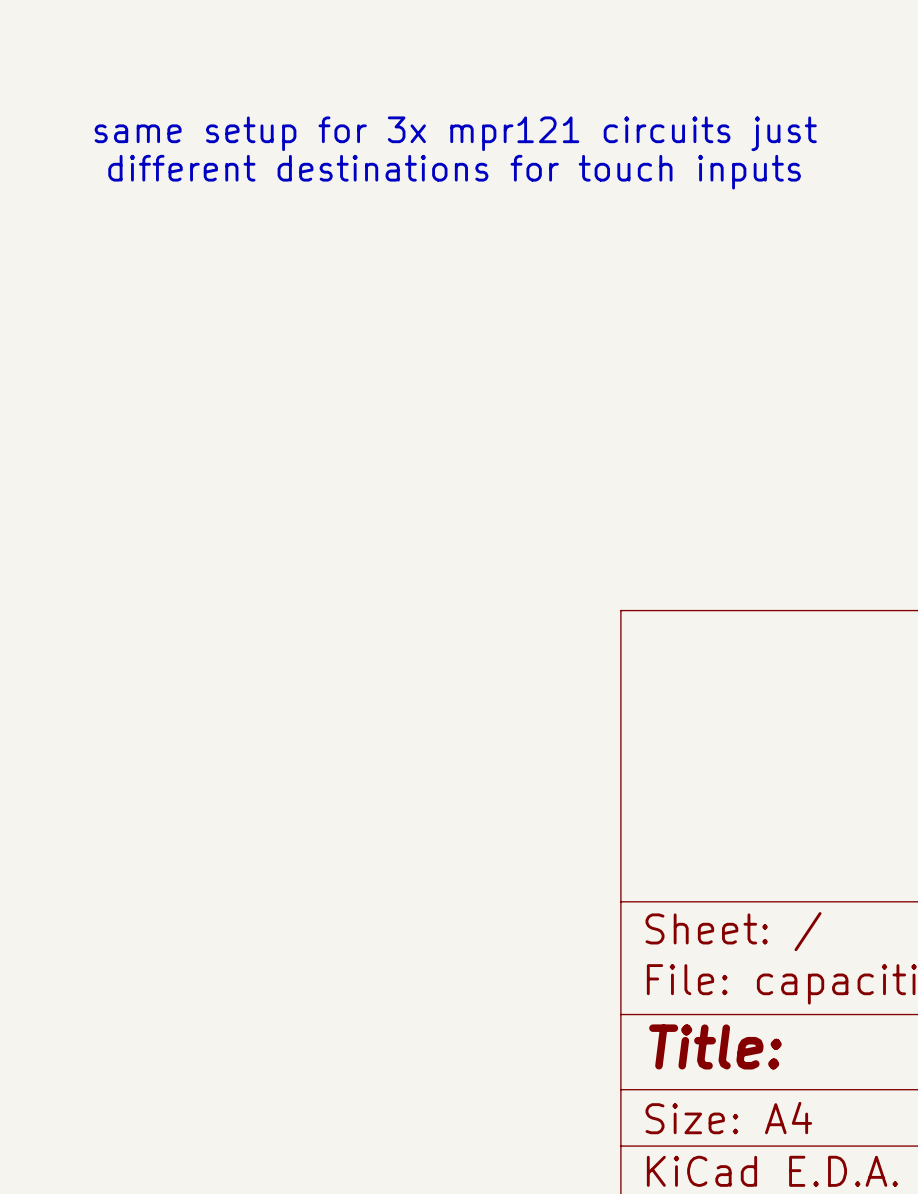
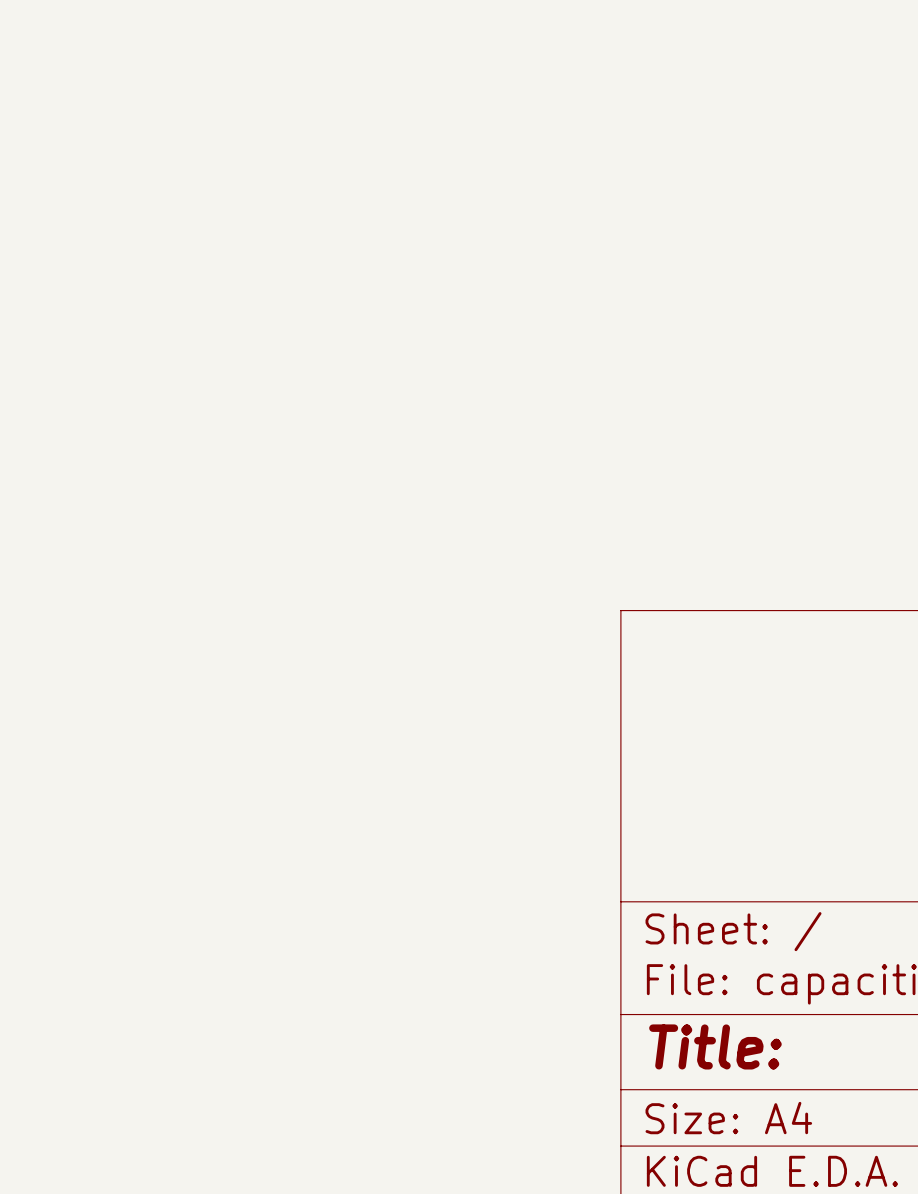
text: same setup for 3x mpr121 circuits just (455, 133) -> none
text: different destinations for touch inputs (454, 172) -> none

